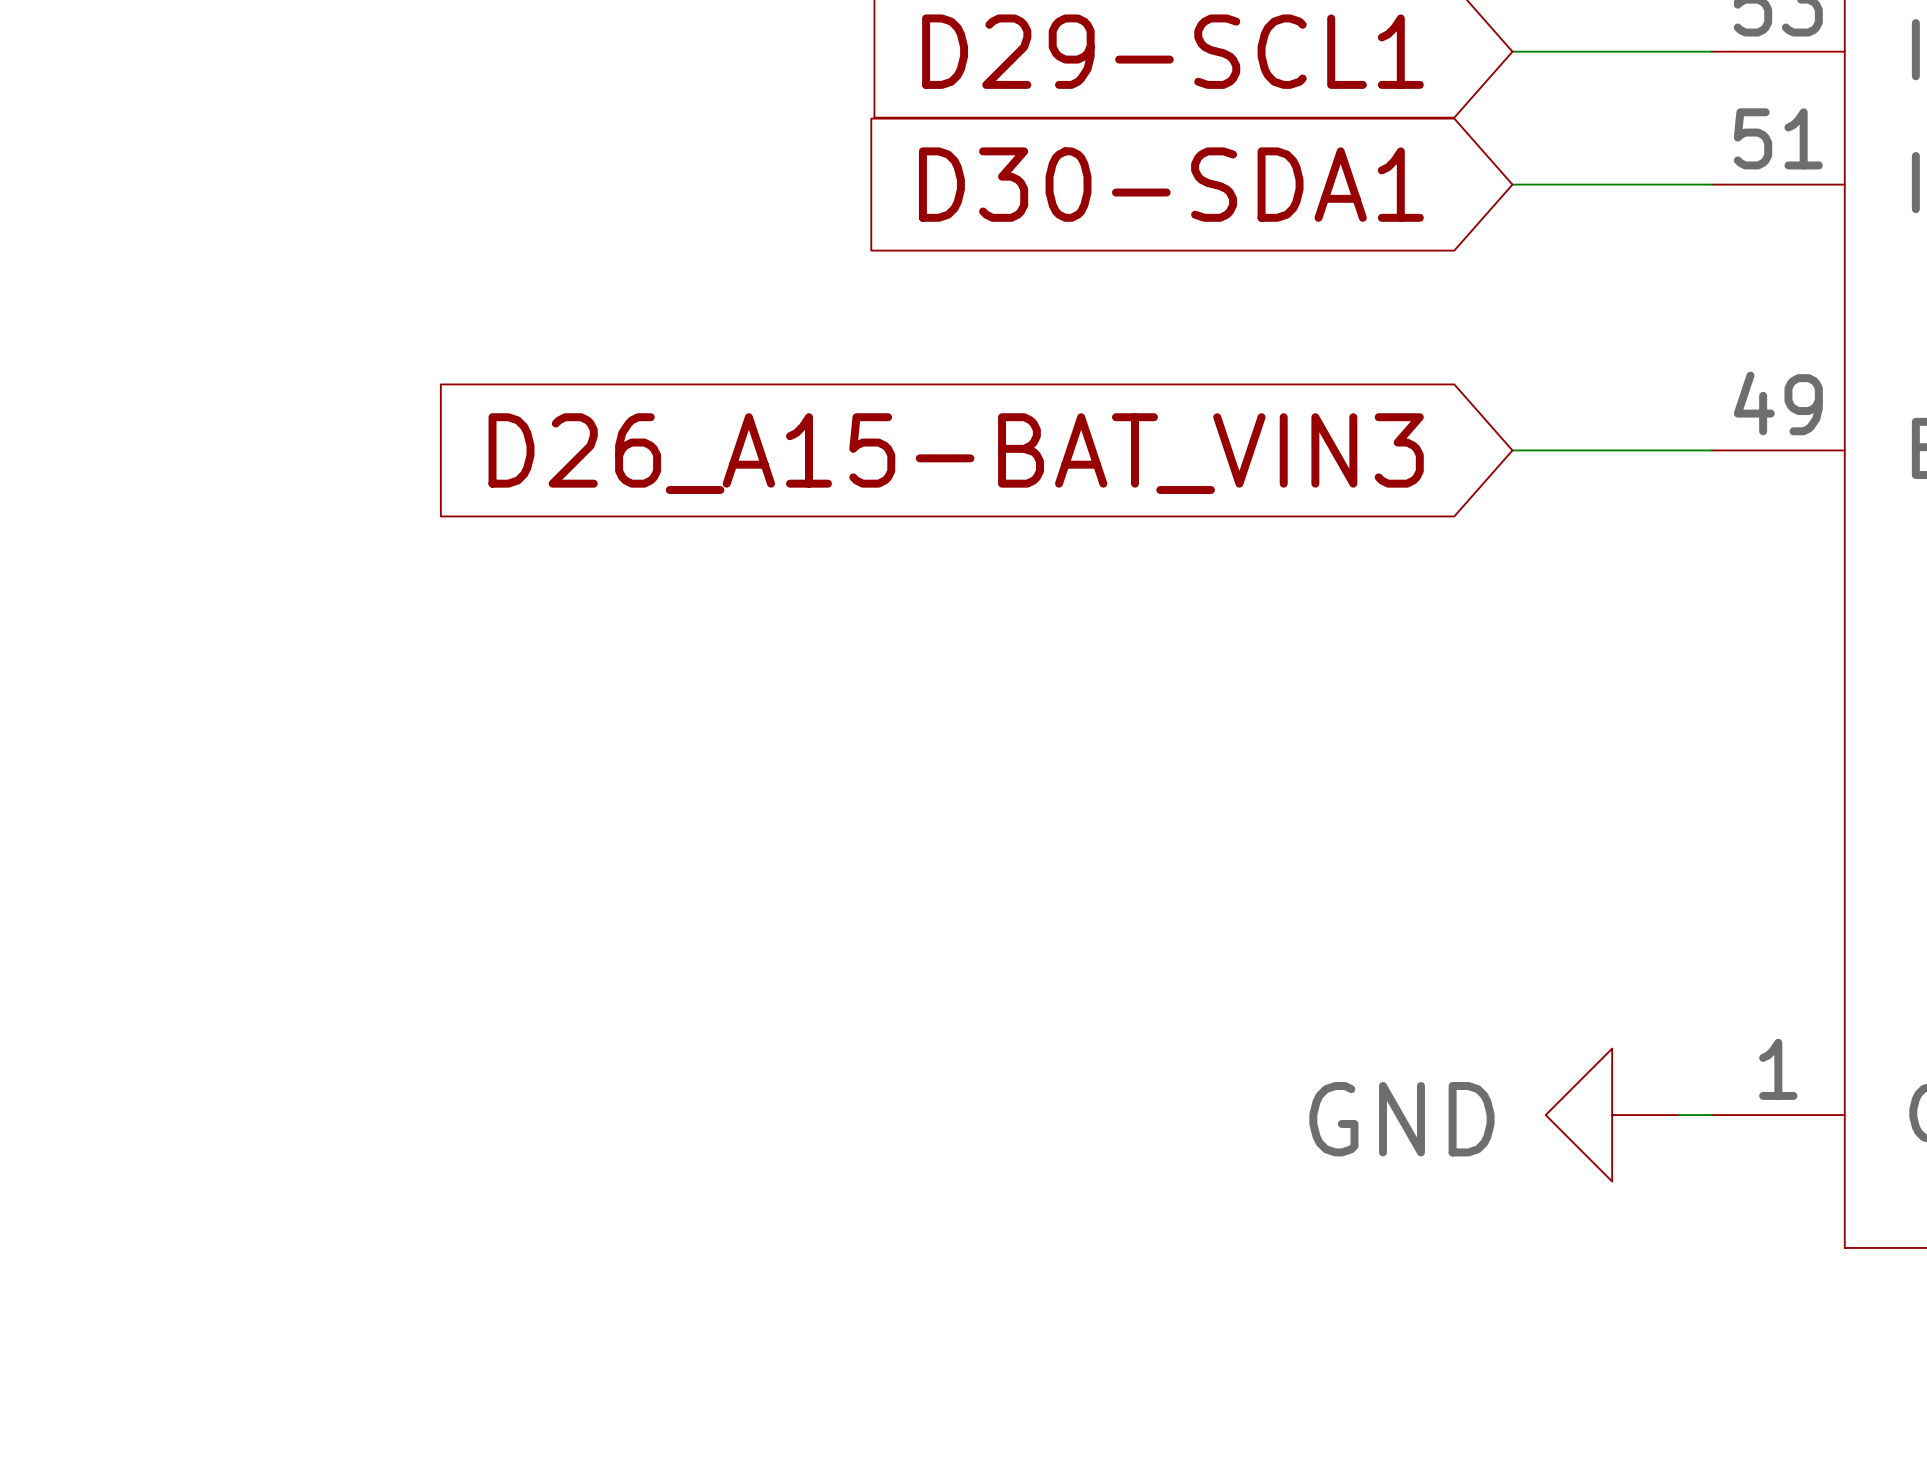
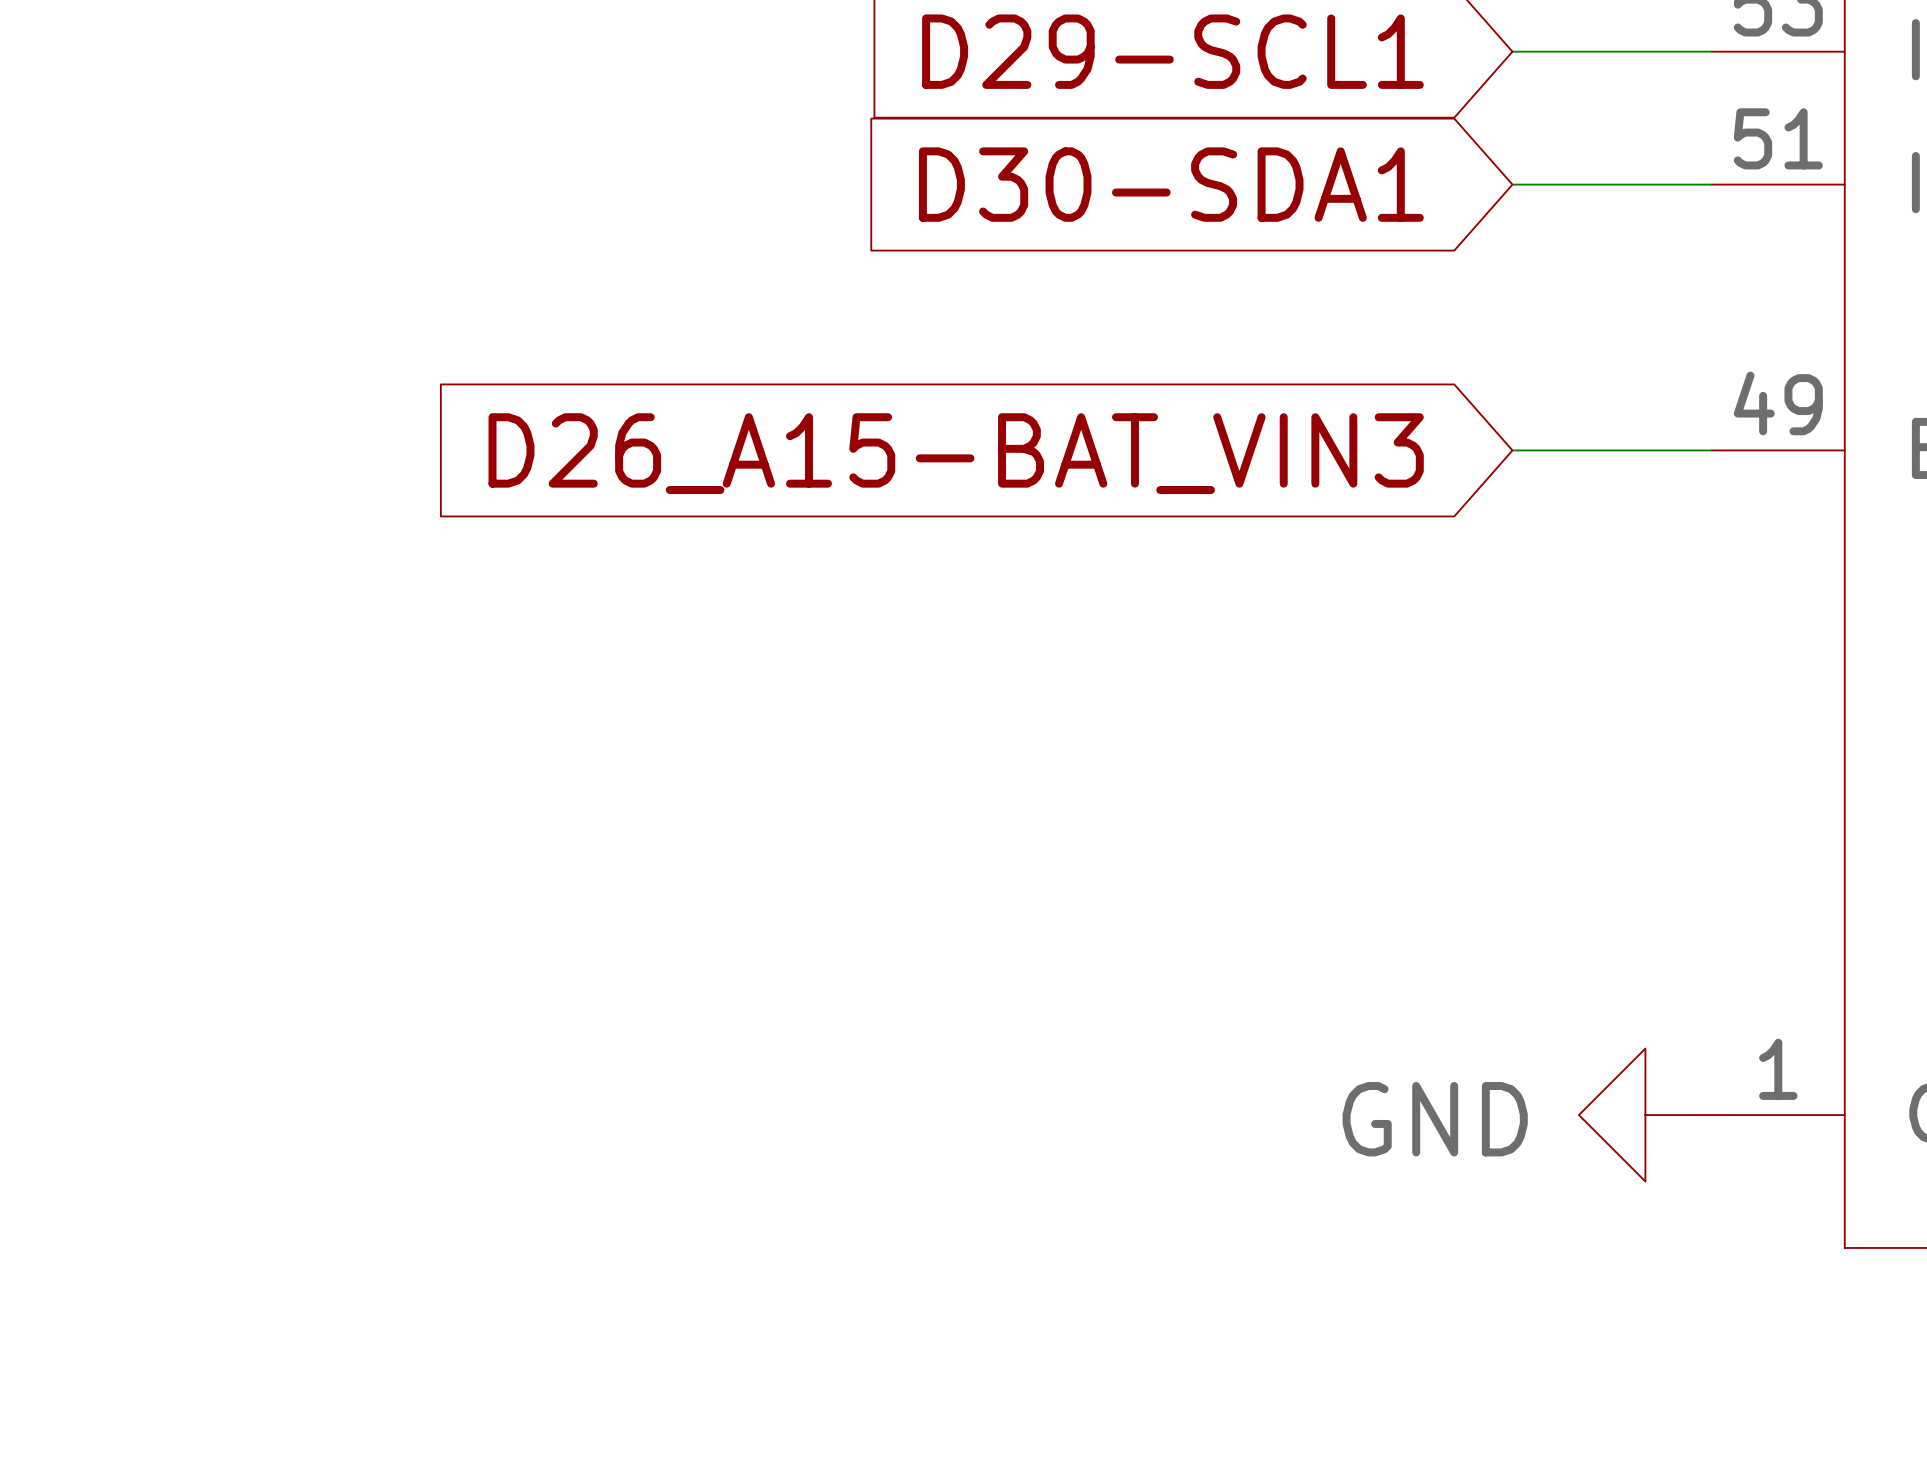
power symbol position: GND (1612, 1115) -> GND (1645, 1115)

